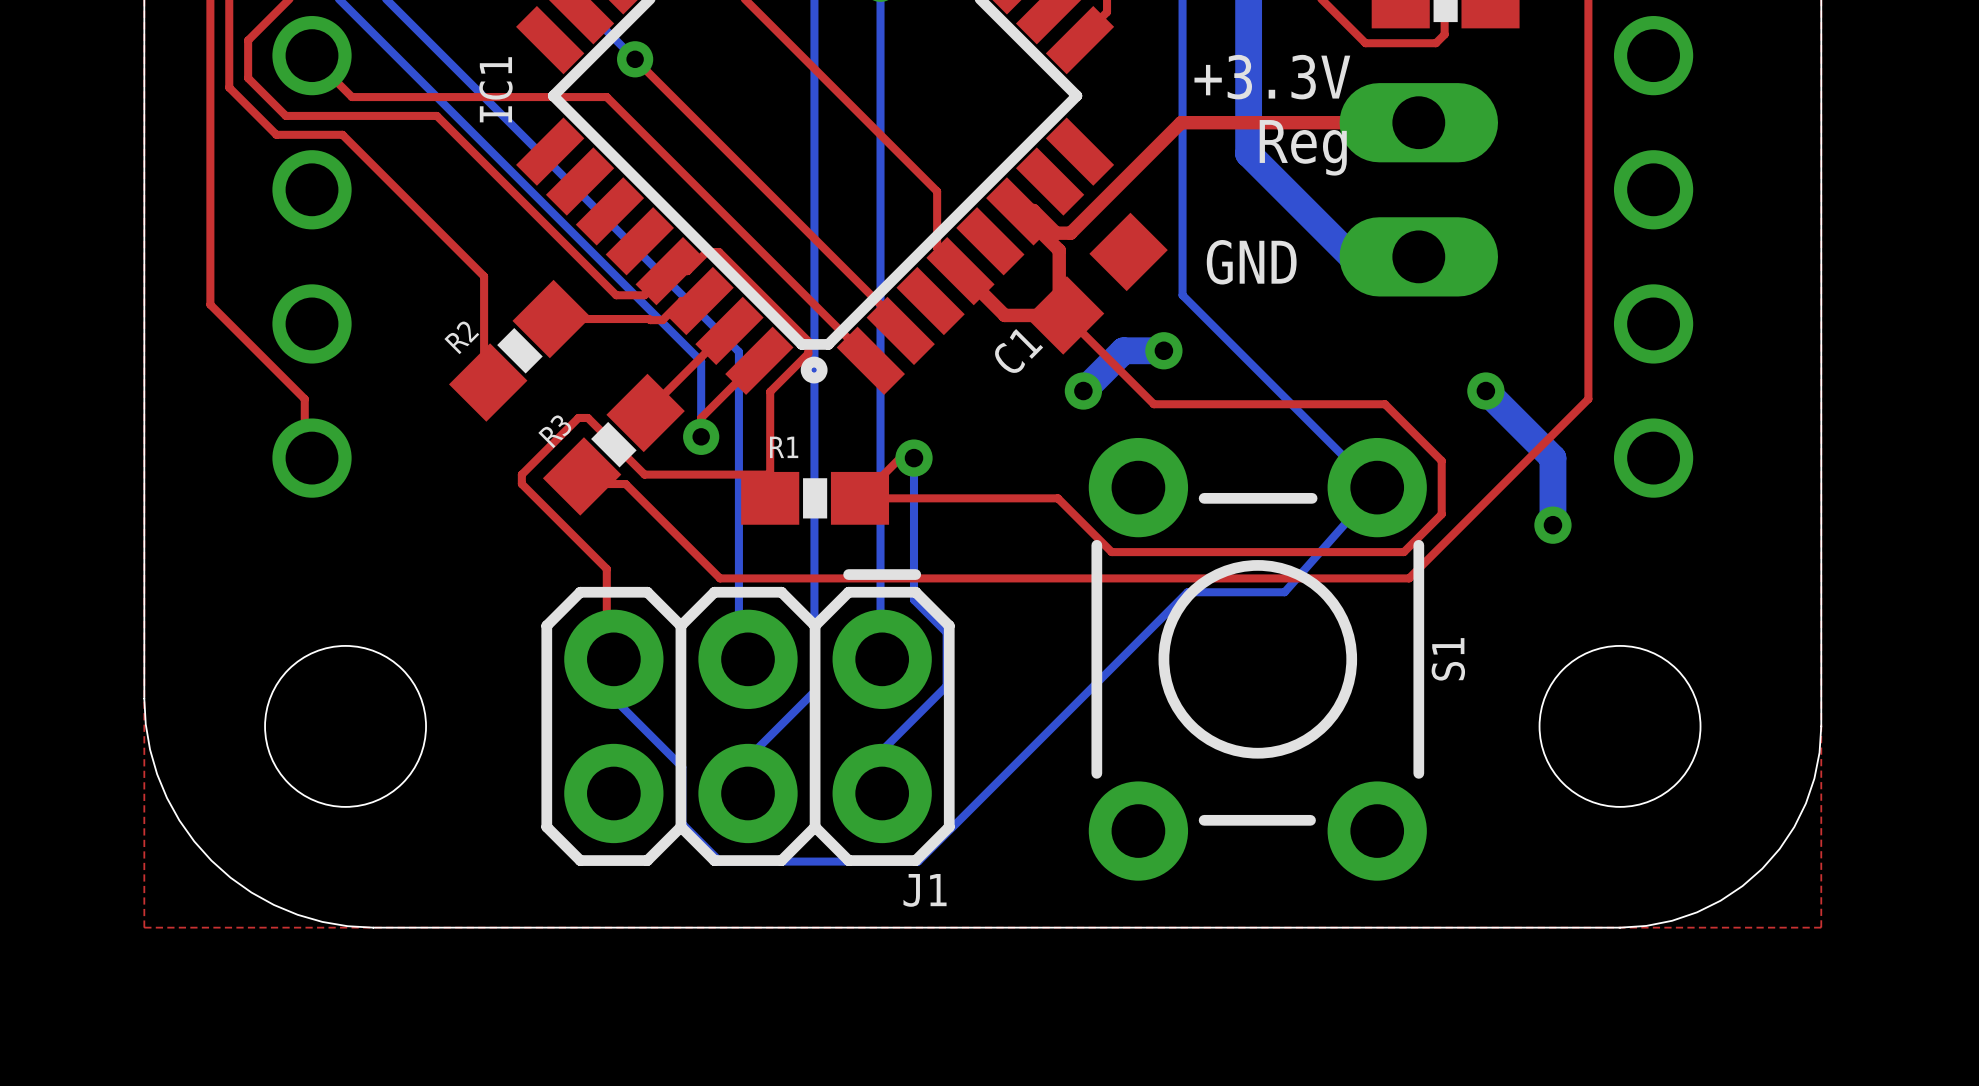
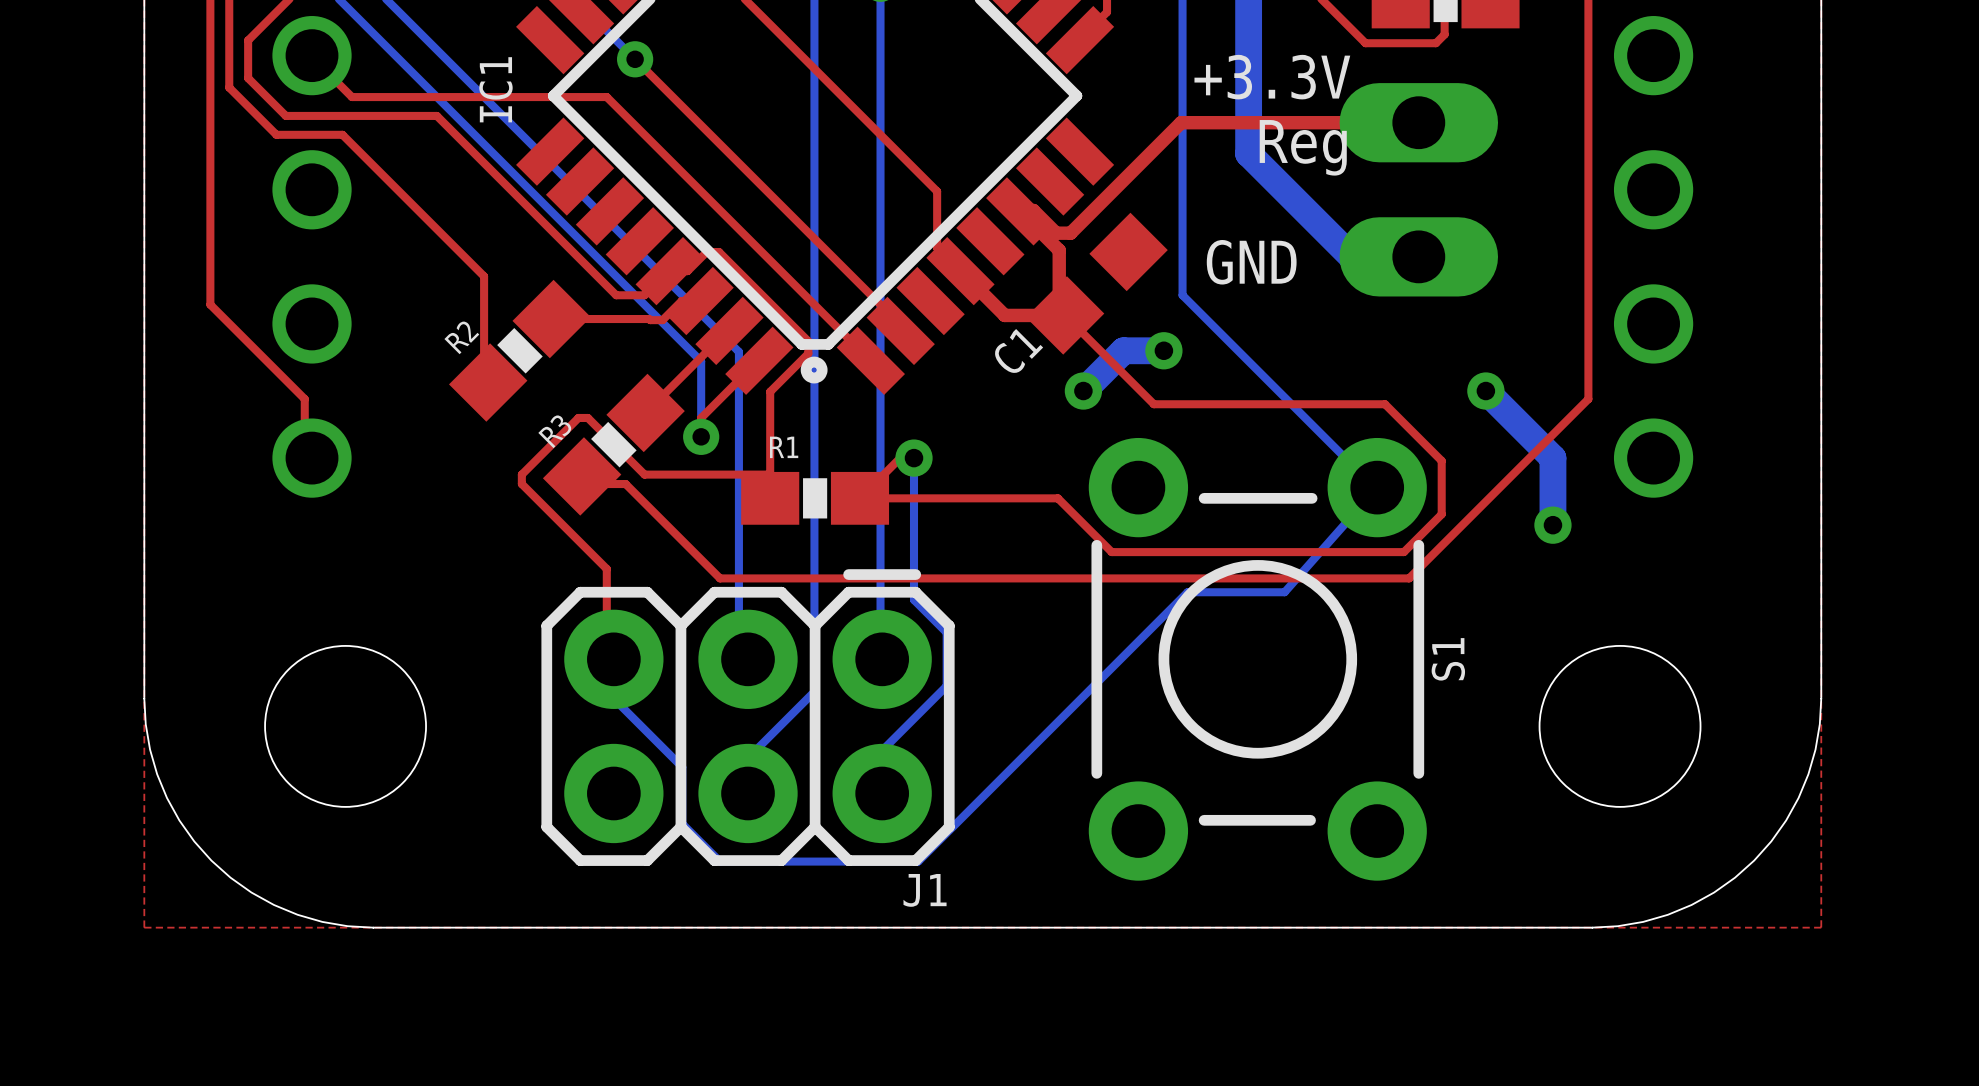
board edge: (1821, 698) (1819, 752) (1814, 778) (1805, 803) (1794, 827) (1779, 848) (1762, 868) (1742, 886) (1720, 900) (1697, 912) (1672, 920) (1646, 925) (1592, 927) -> (1821, 698) (1815, 749) (1808, 774) (1786, 820) (1754, 860) (1714, 892) (1667, 914) (1643, 921) (1592, 927)

